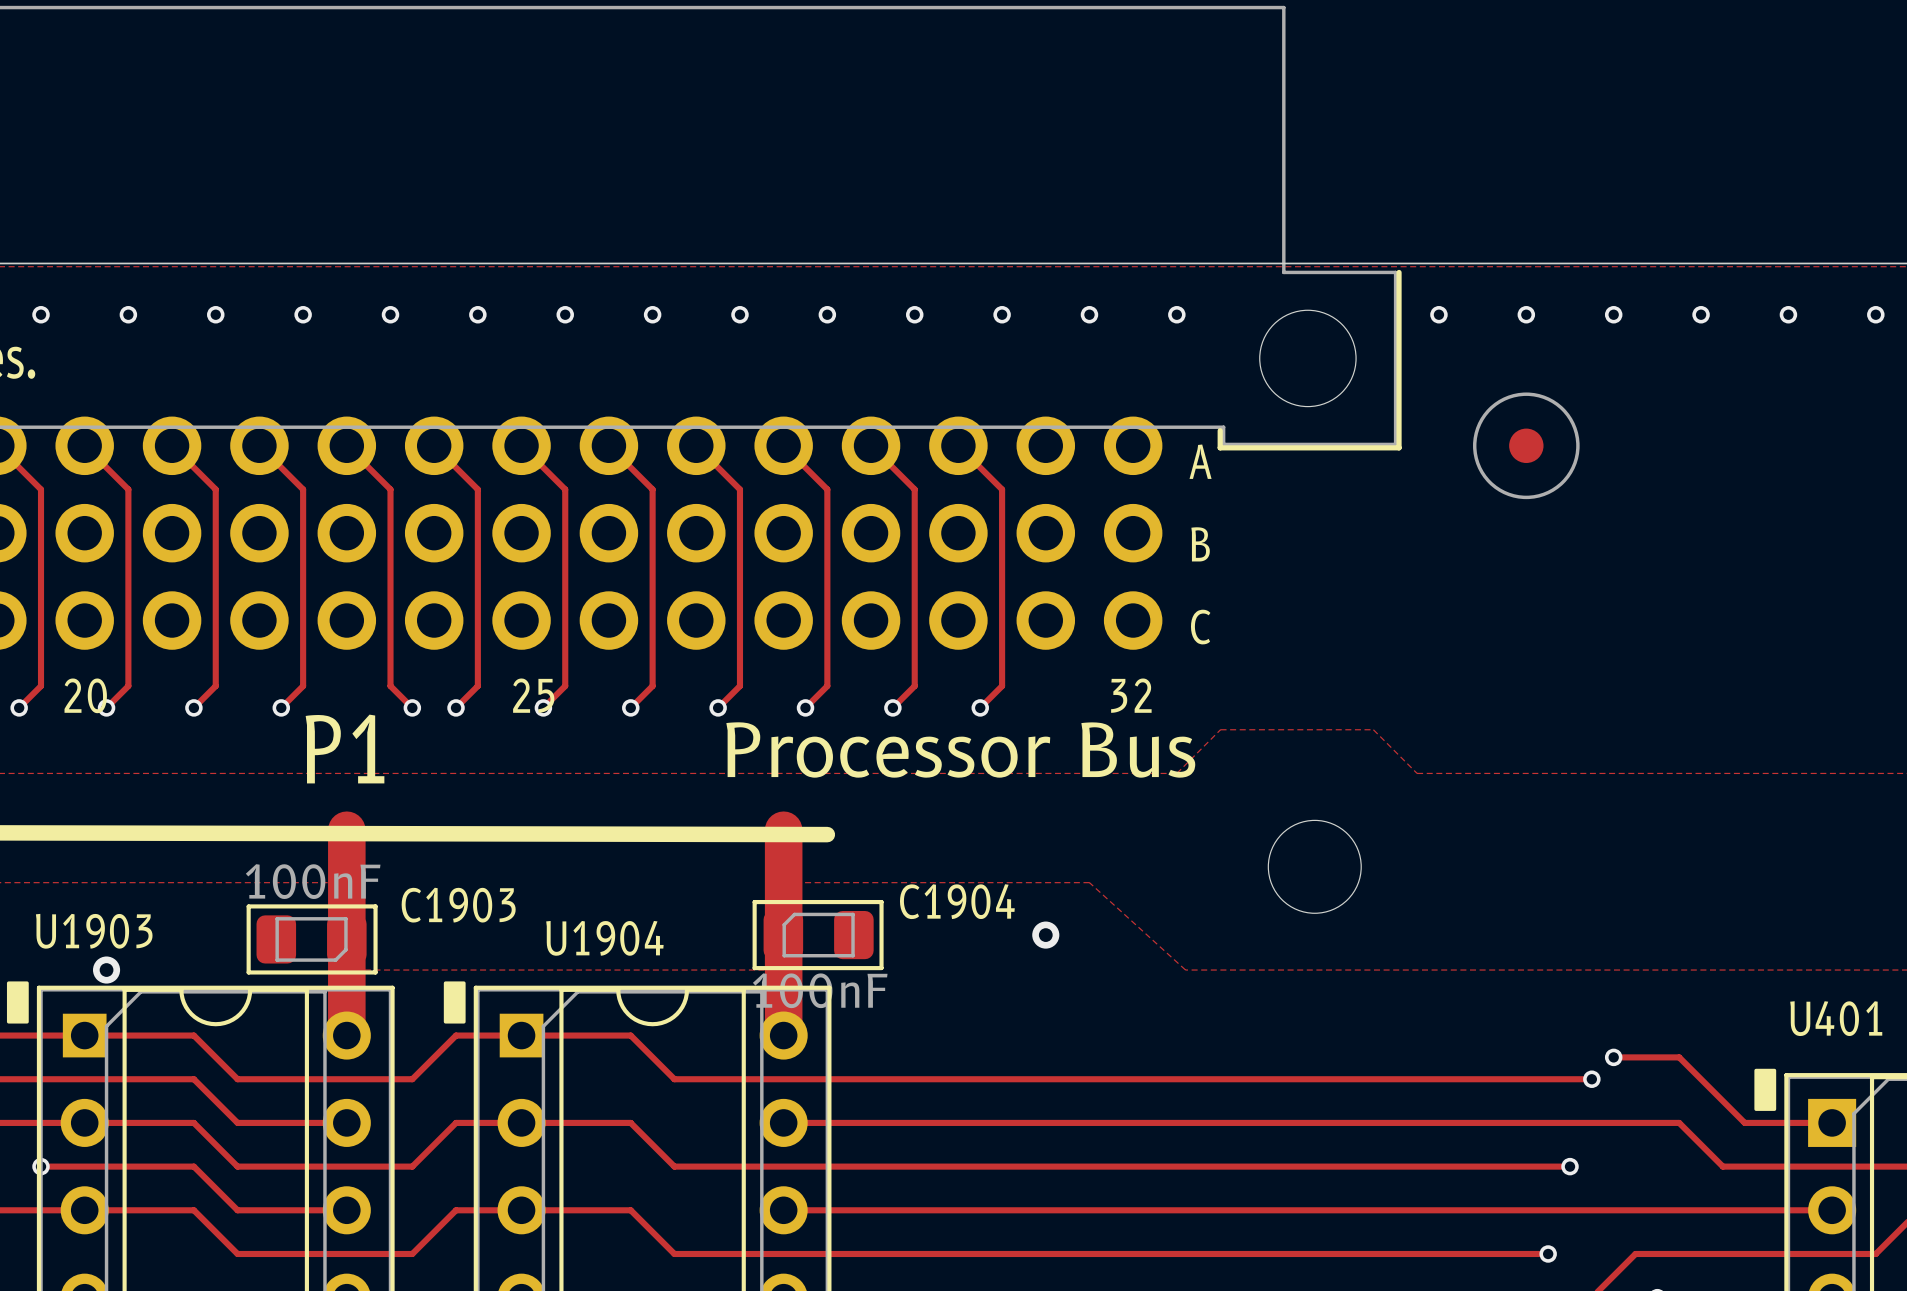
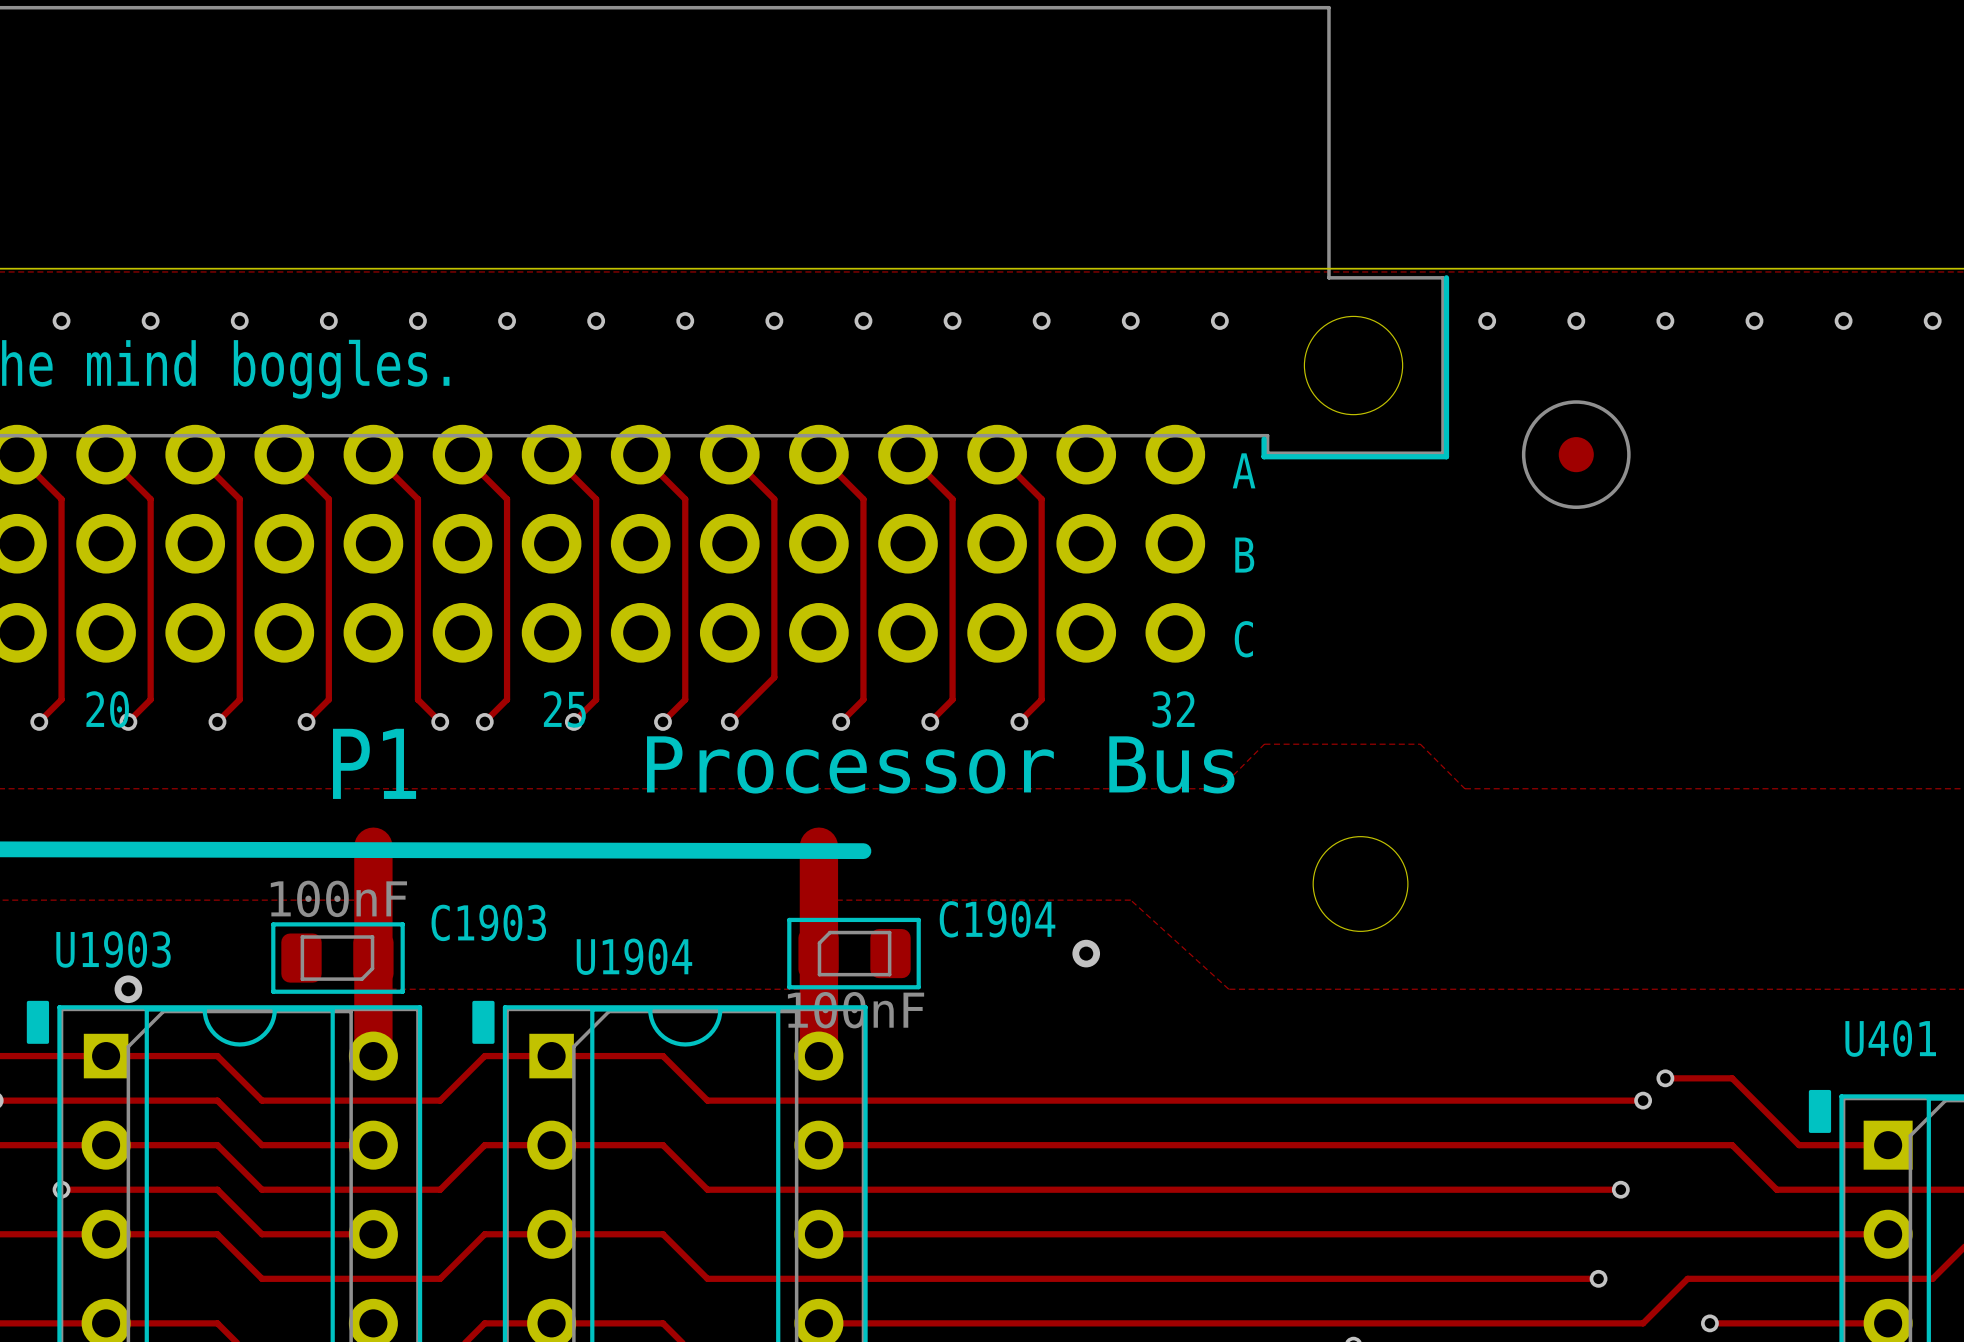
track: (739, 664) (739, 686) (718, 707) -> (774, 677) (729, 721)
via position: (718, 707) -> (729, 721)

